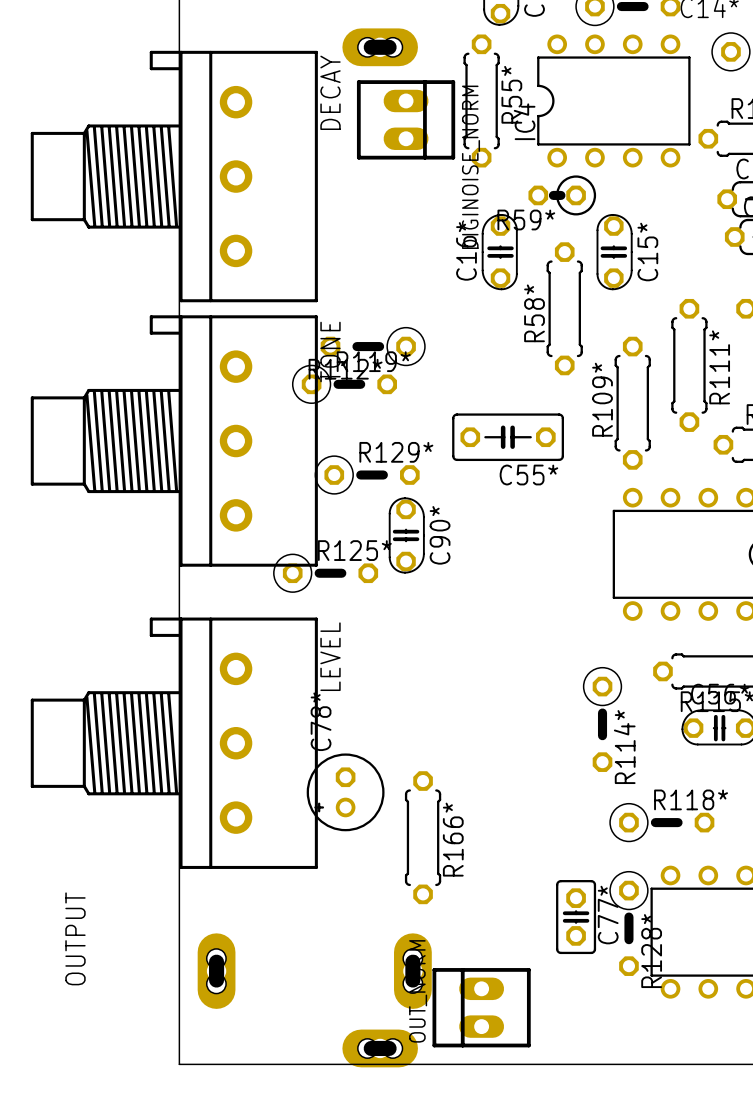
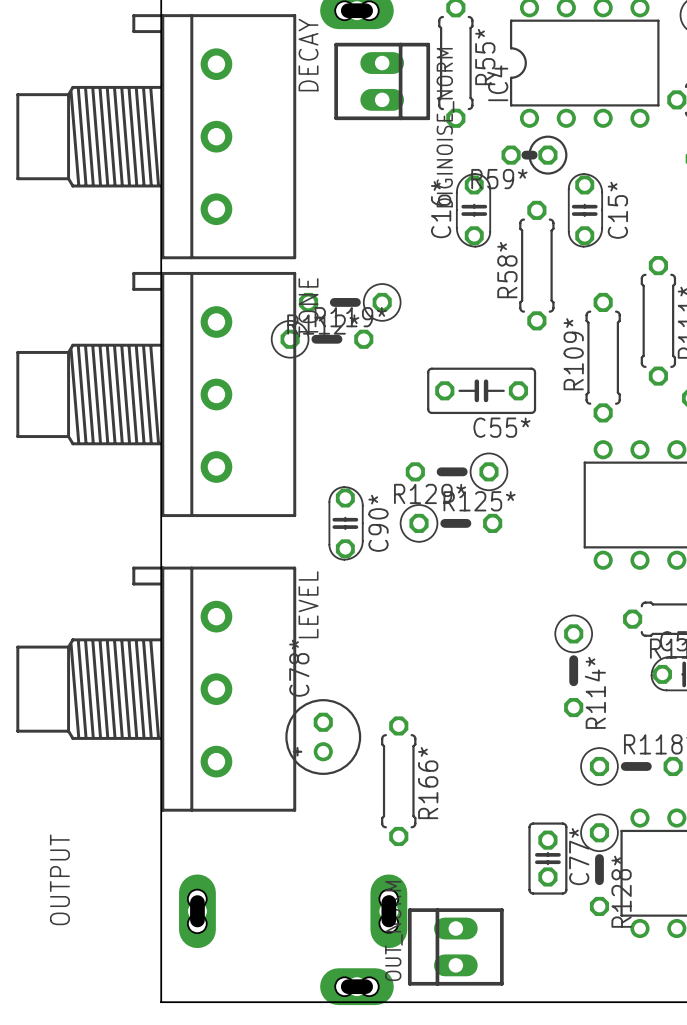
R129* rotation: 0° (367, 475) -> 180° (456, 471)
R129* position: (367, 475) -> (456, 471)
C90* position: (406, 535) -> (346, 523)
R125* position: (325, 573) -> (451, 523)

